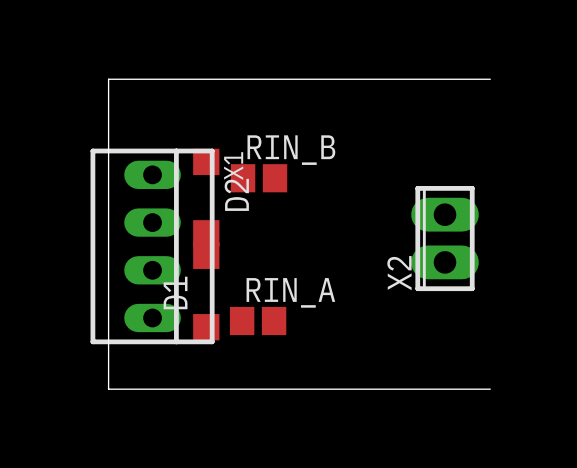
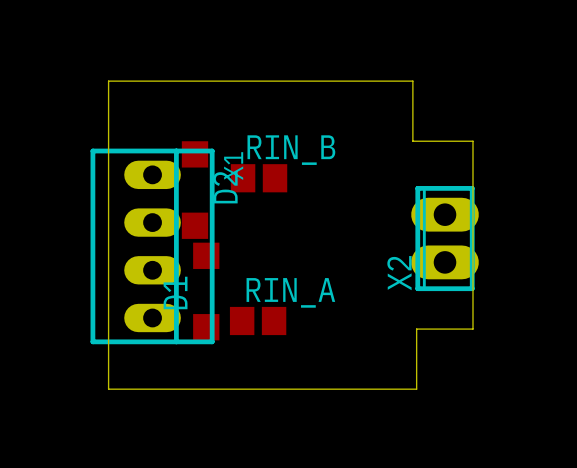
board edge: (490, 79) (108, 79) (108, 81) -> (416, 389) (416, 329) (472, 329) (472, 141) (412, 141) (412, 81) (108, 81)
D2 position: (206, 197) -> (194, 190)
board edge: (416, 389) (490, 389) -> none

